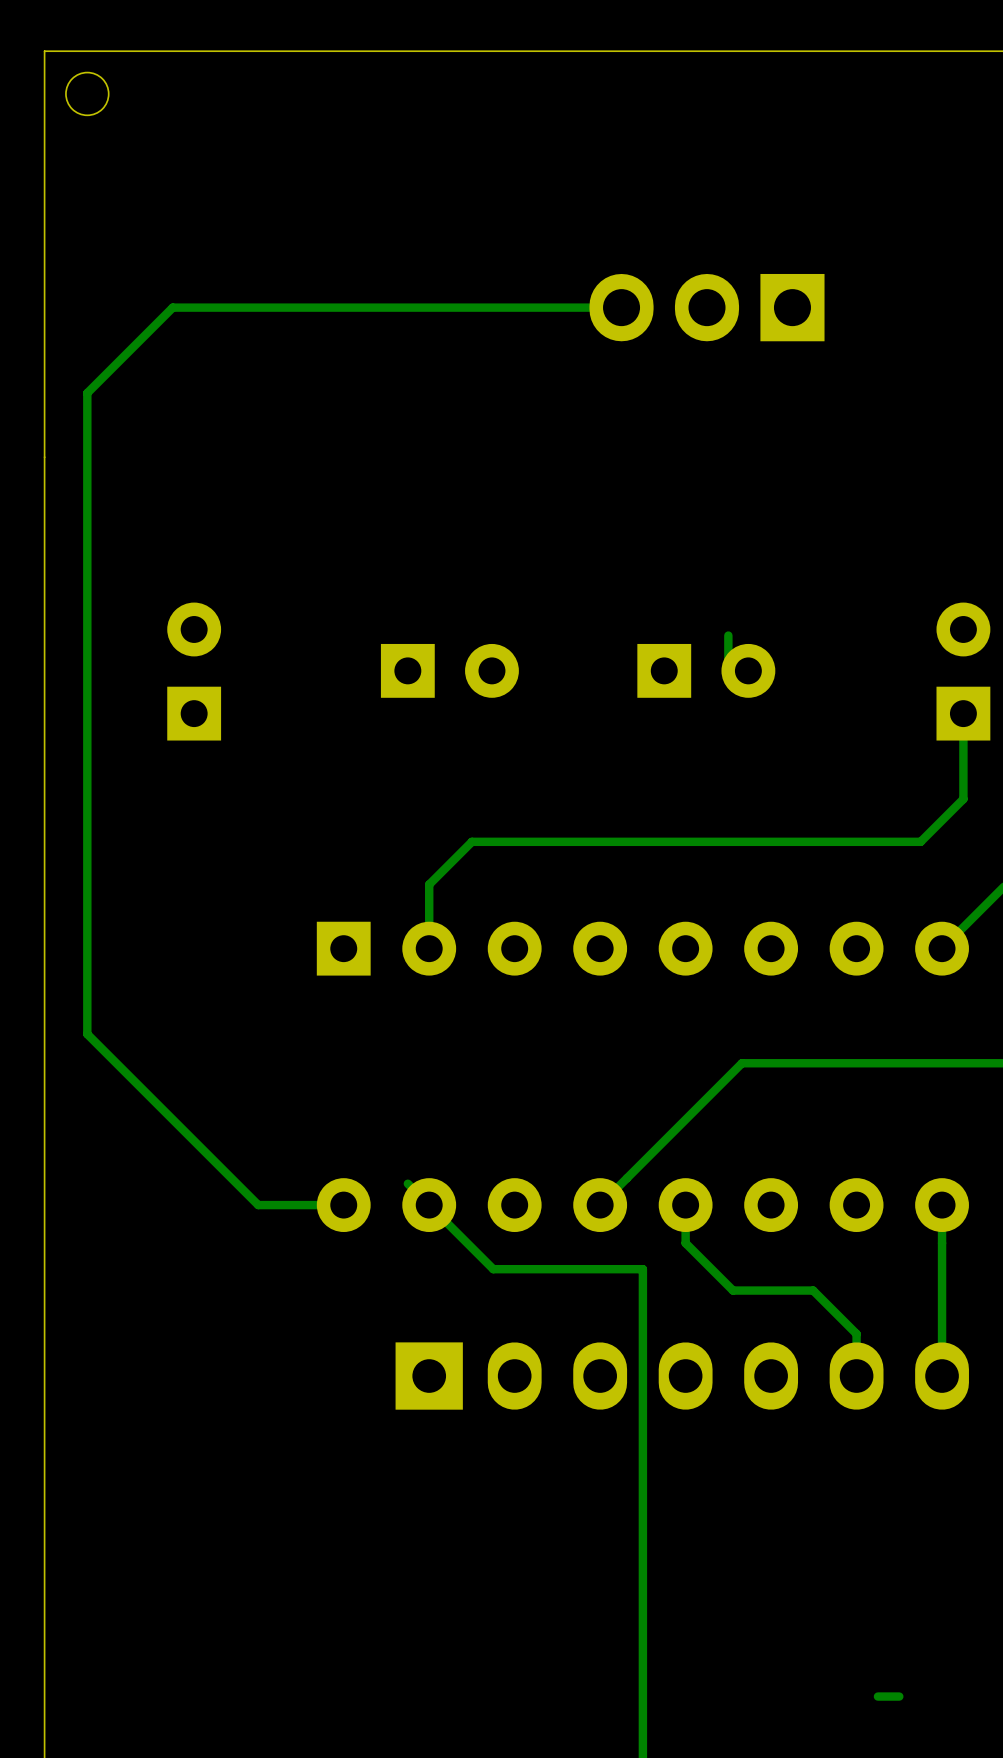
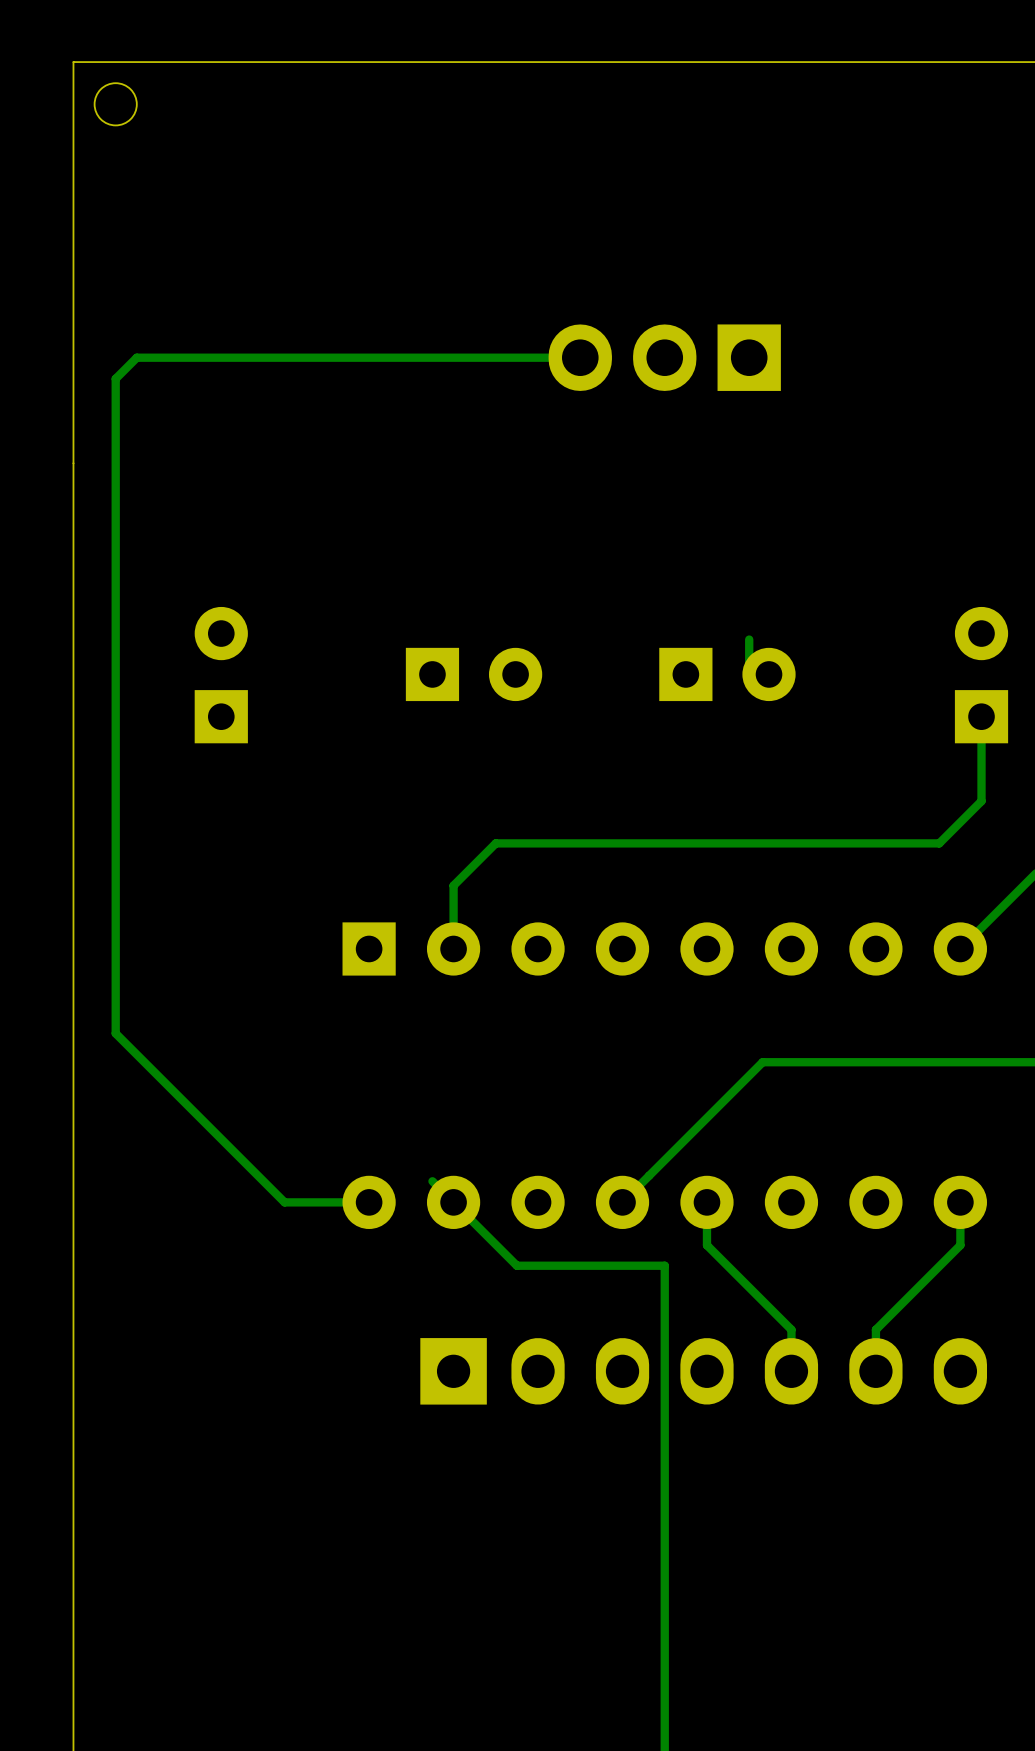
track: (621, 307) (172, 307) (87, 393) -> (580, 357) (136, 357) (115, 378) (115, 399)
part position: (707, 307) -> (664, 357)
track: (685, 1243) (733, 1290) (813, 1290) (856, 1333) -> (706, 1240) (706, 1245) (791, 1329) (791, 1371)
track: (942, 1248) (942, 1376) -> (960, 1245) (875, 1329)
track: (899, 1696) (877, 1696) -> none

